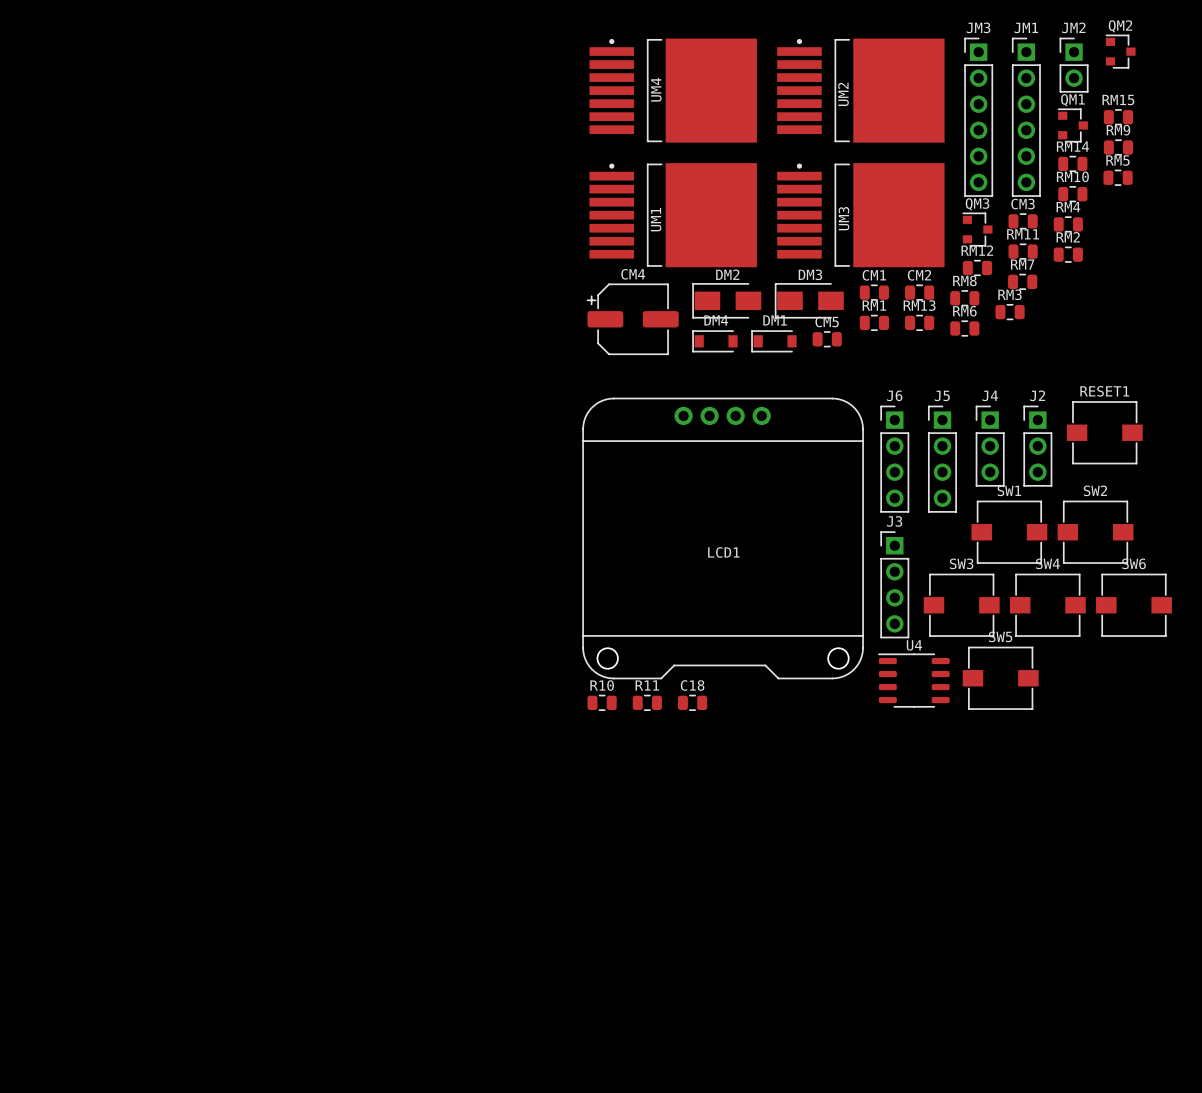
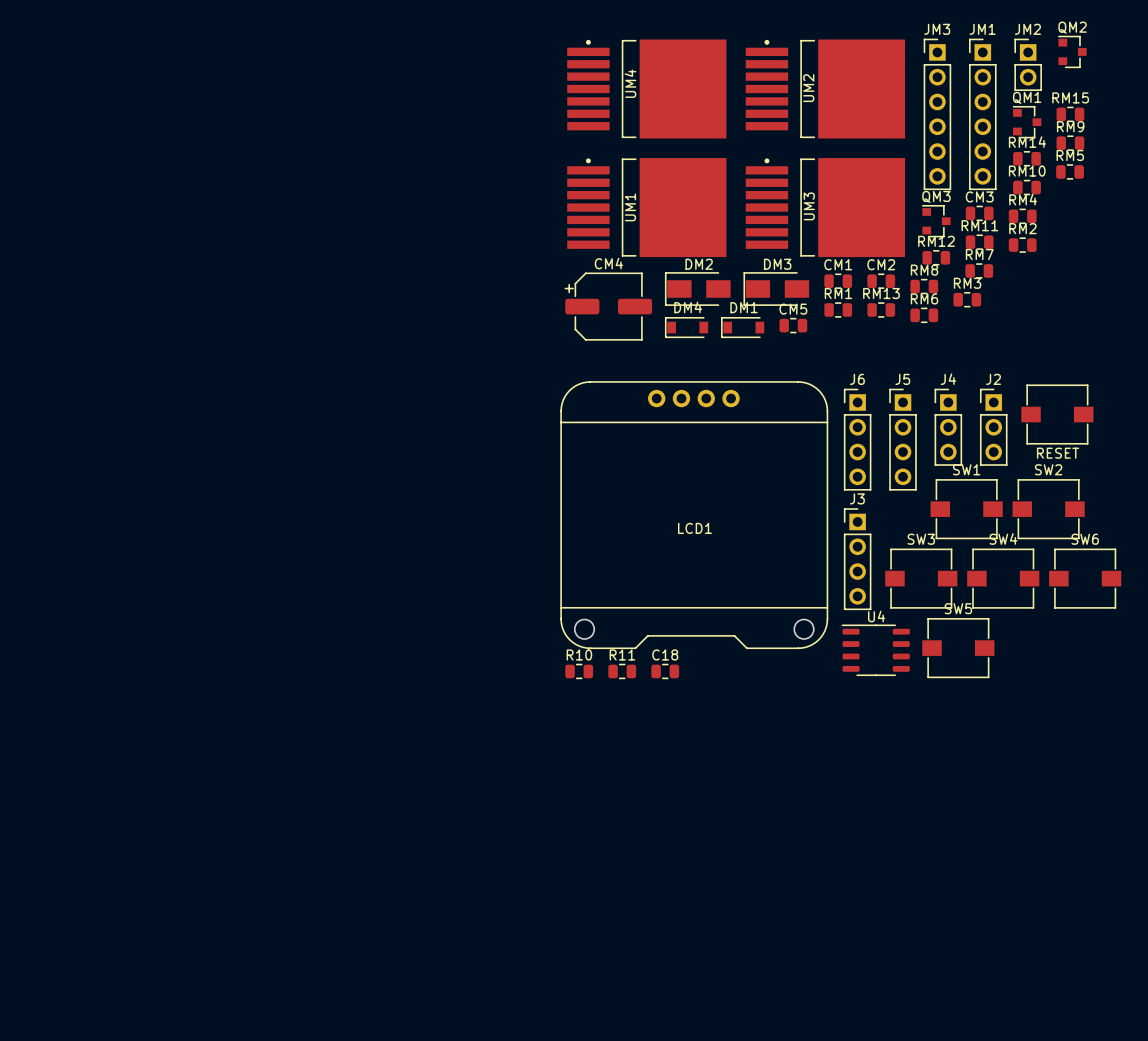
RESET1 name: RESET1 (1104, 391) -> none
RESET1 value: none -> RESET (1058, 453)

